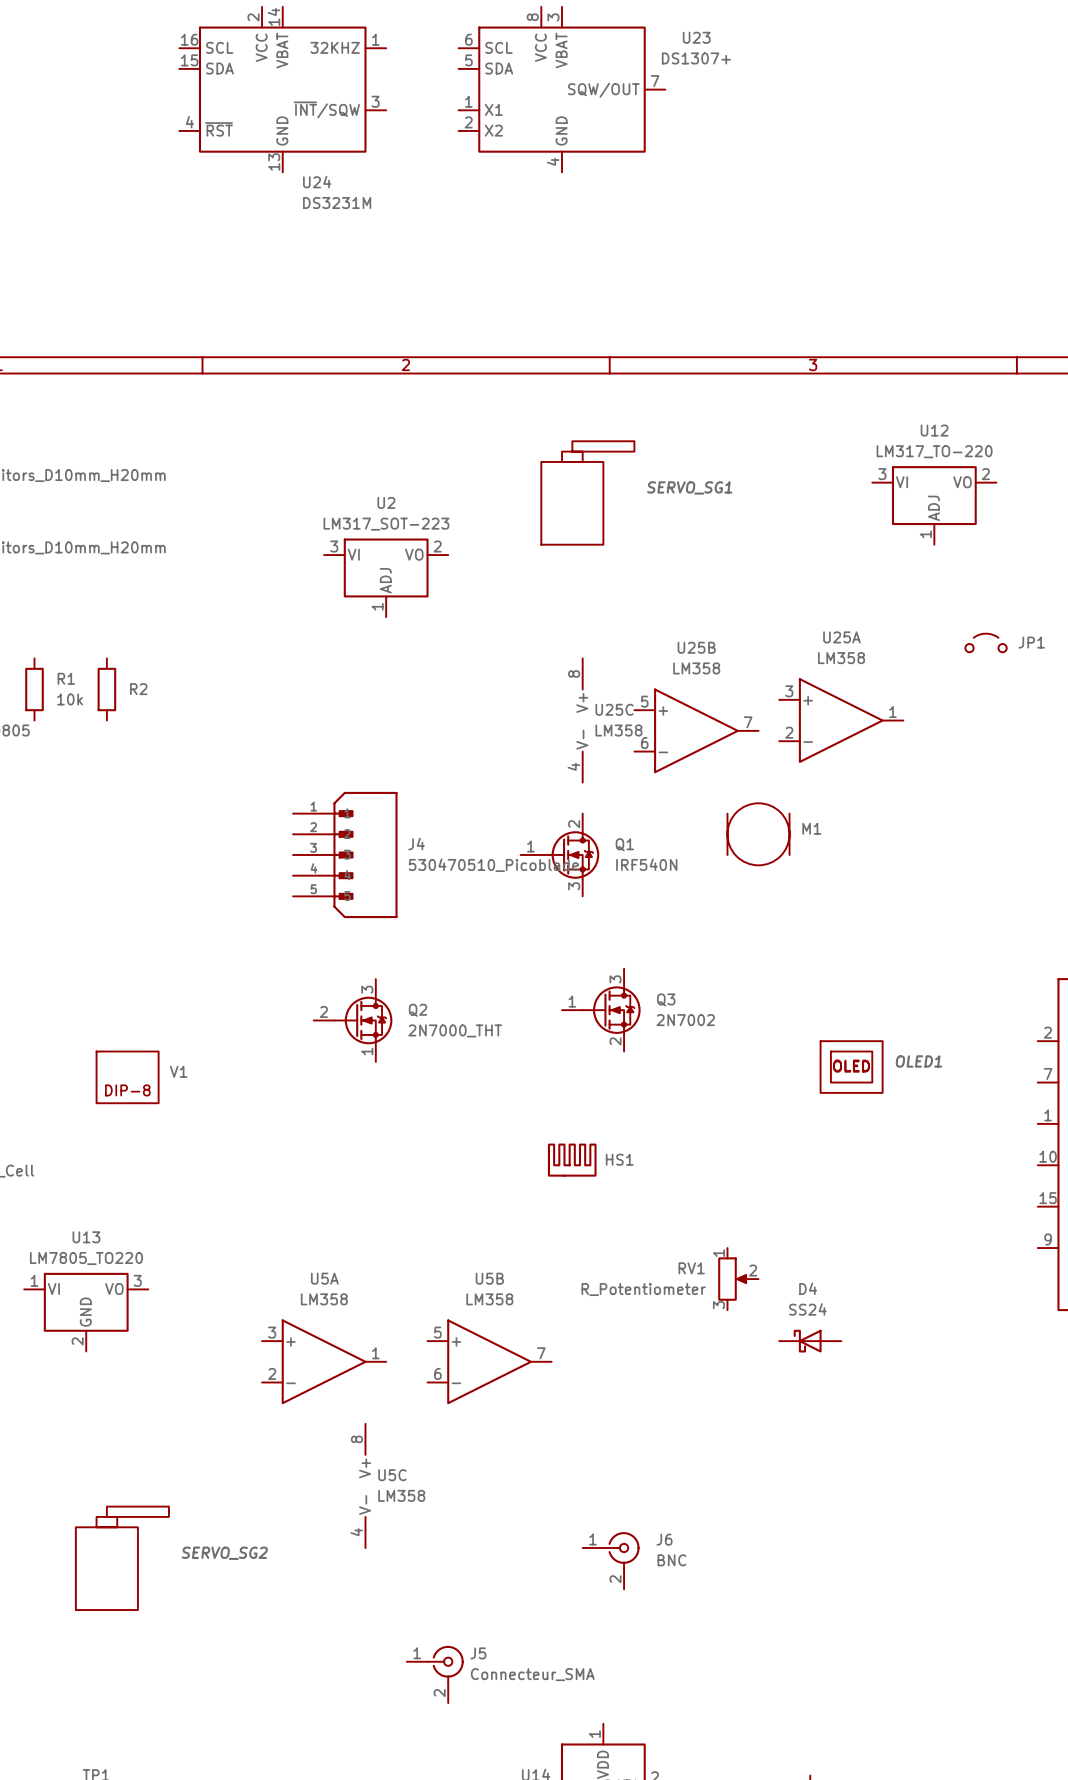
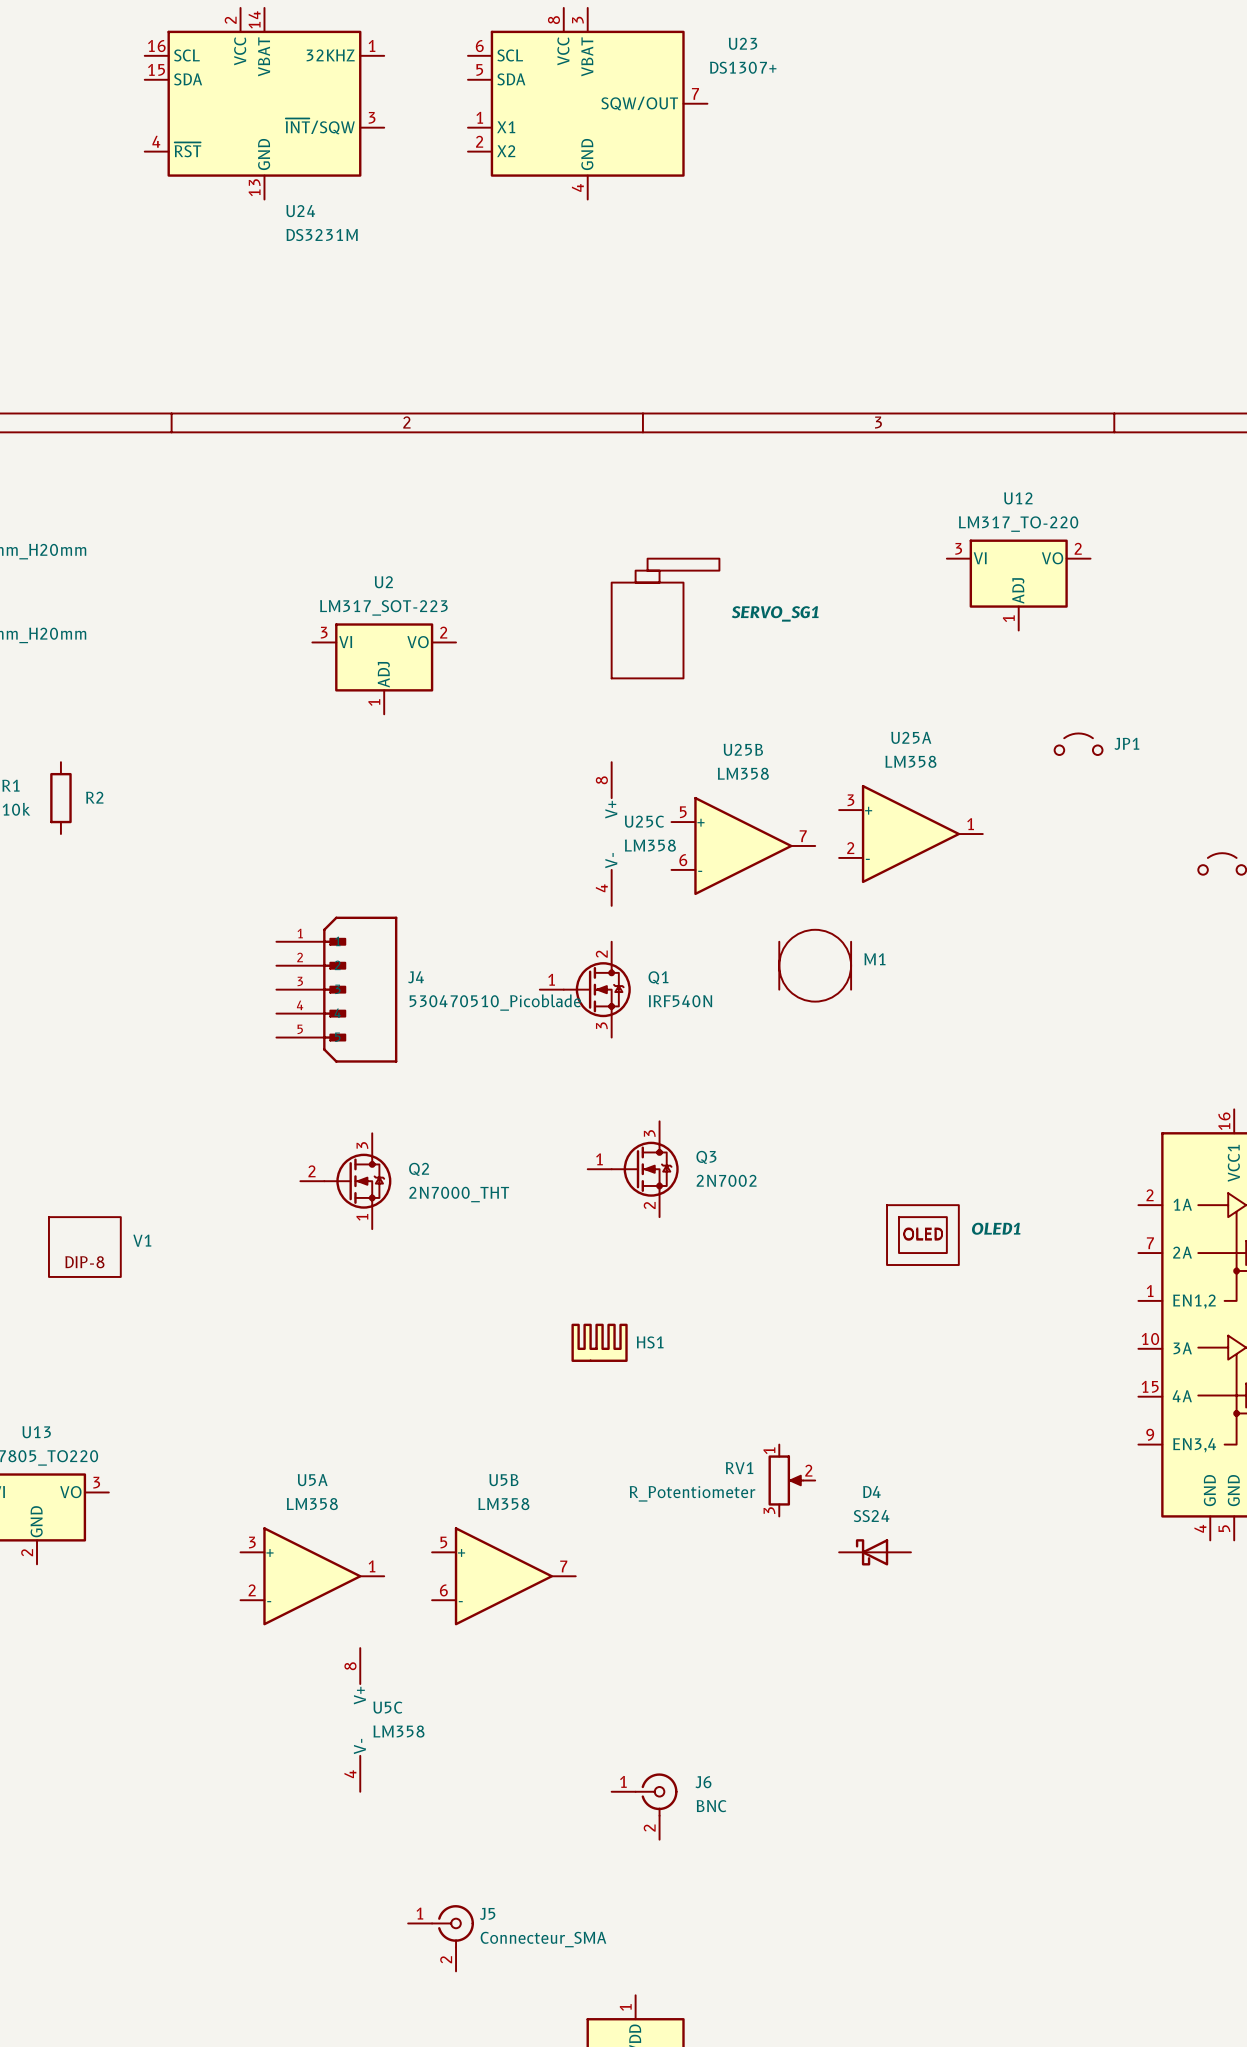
SERVO_SG1 position: (587, 492) -> (665, 618)
SERVO_SG2: (122, 1558) -> none

